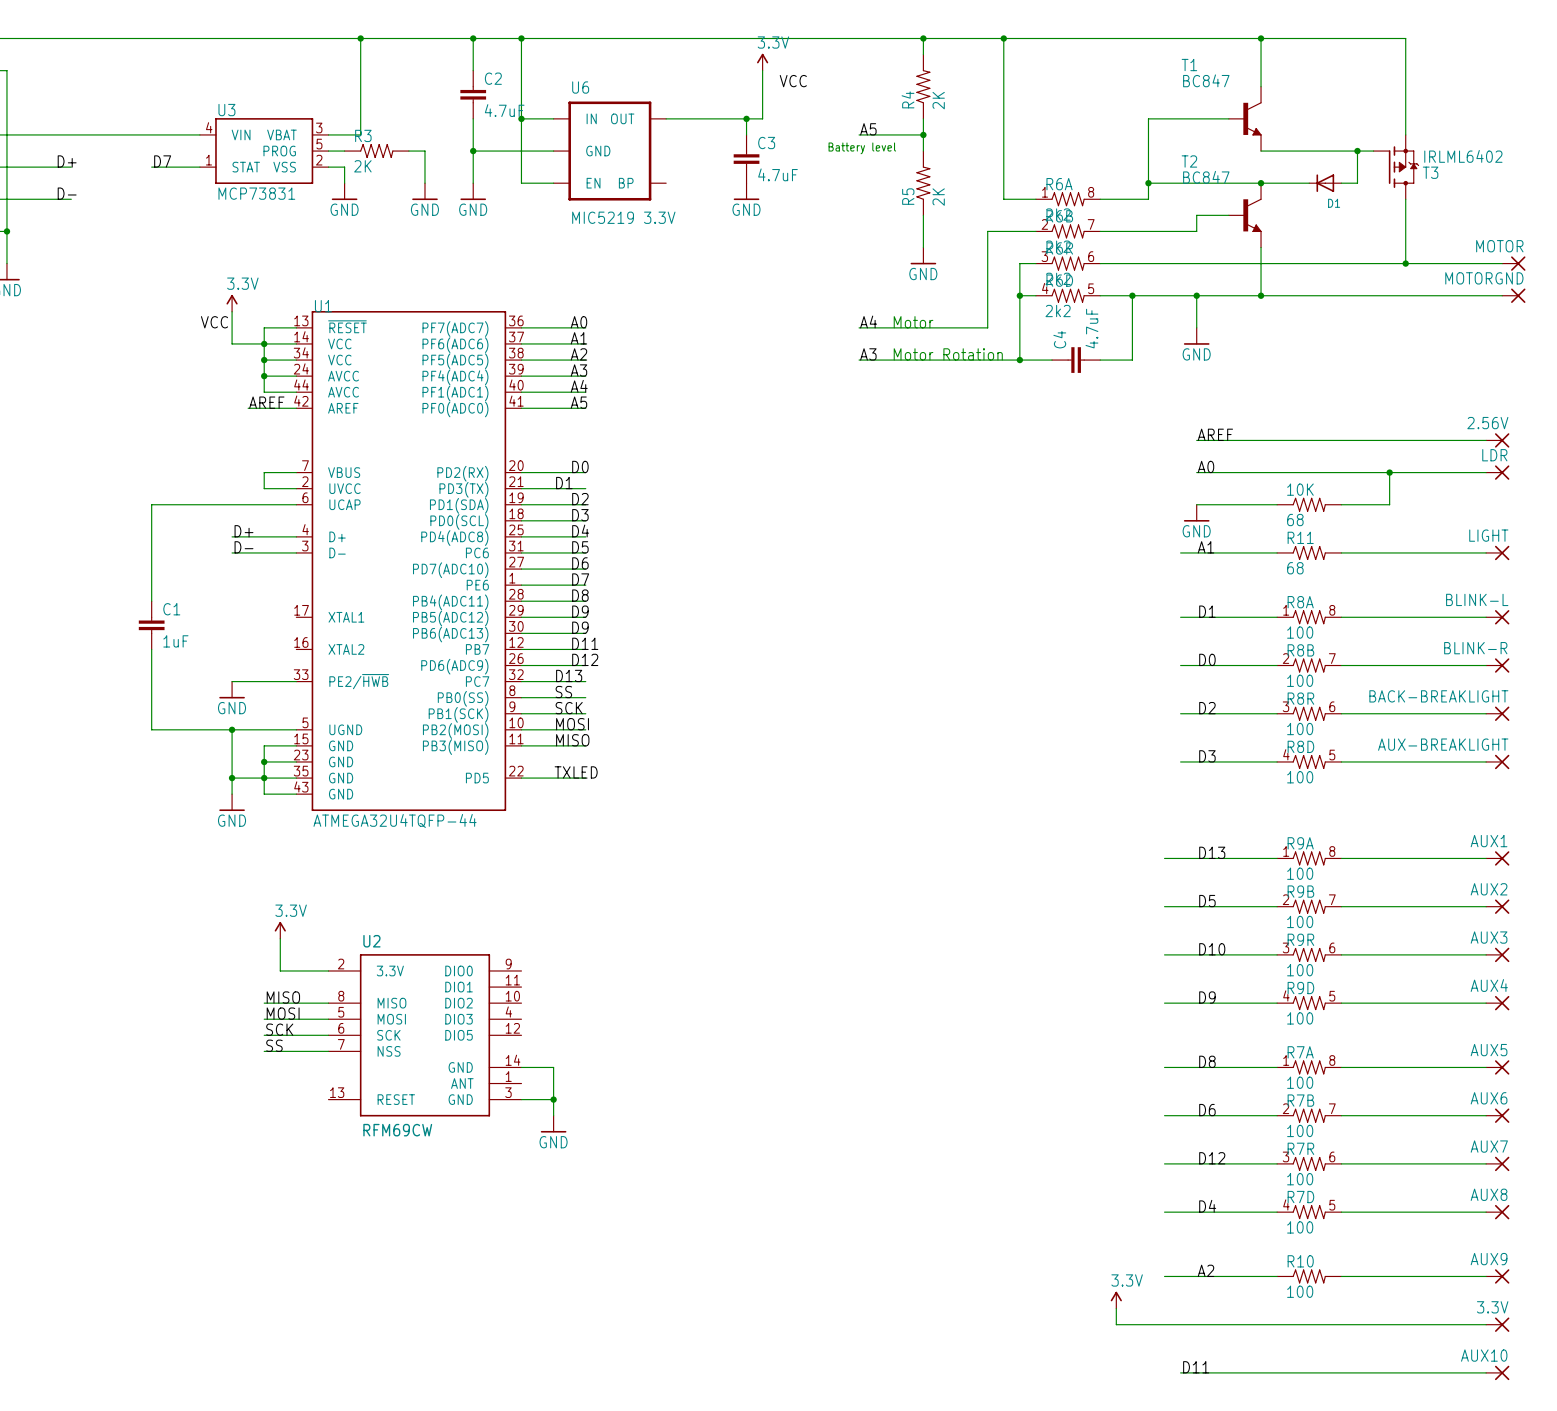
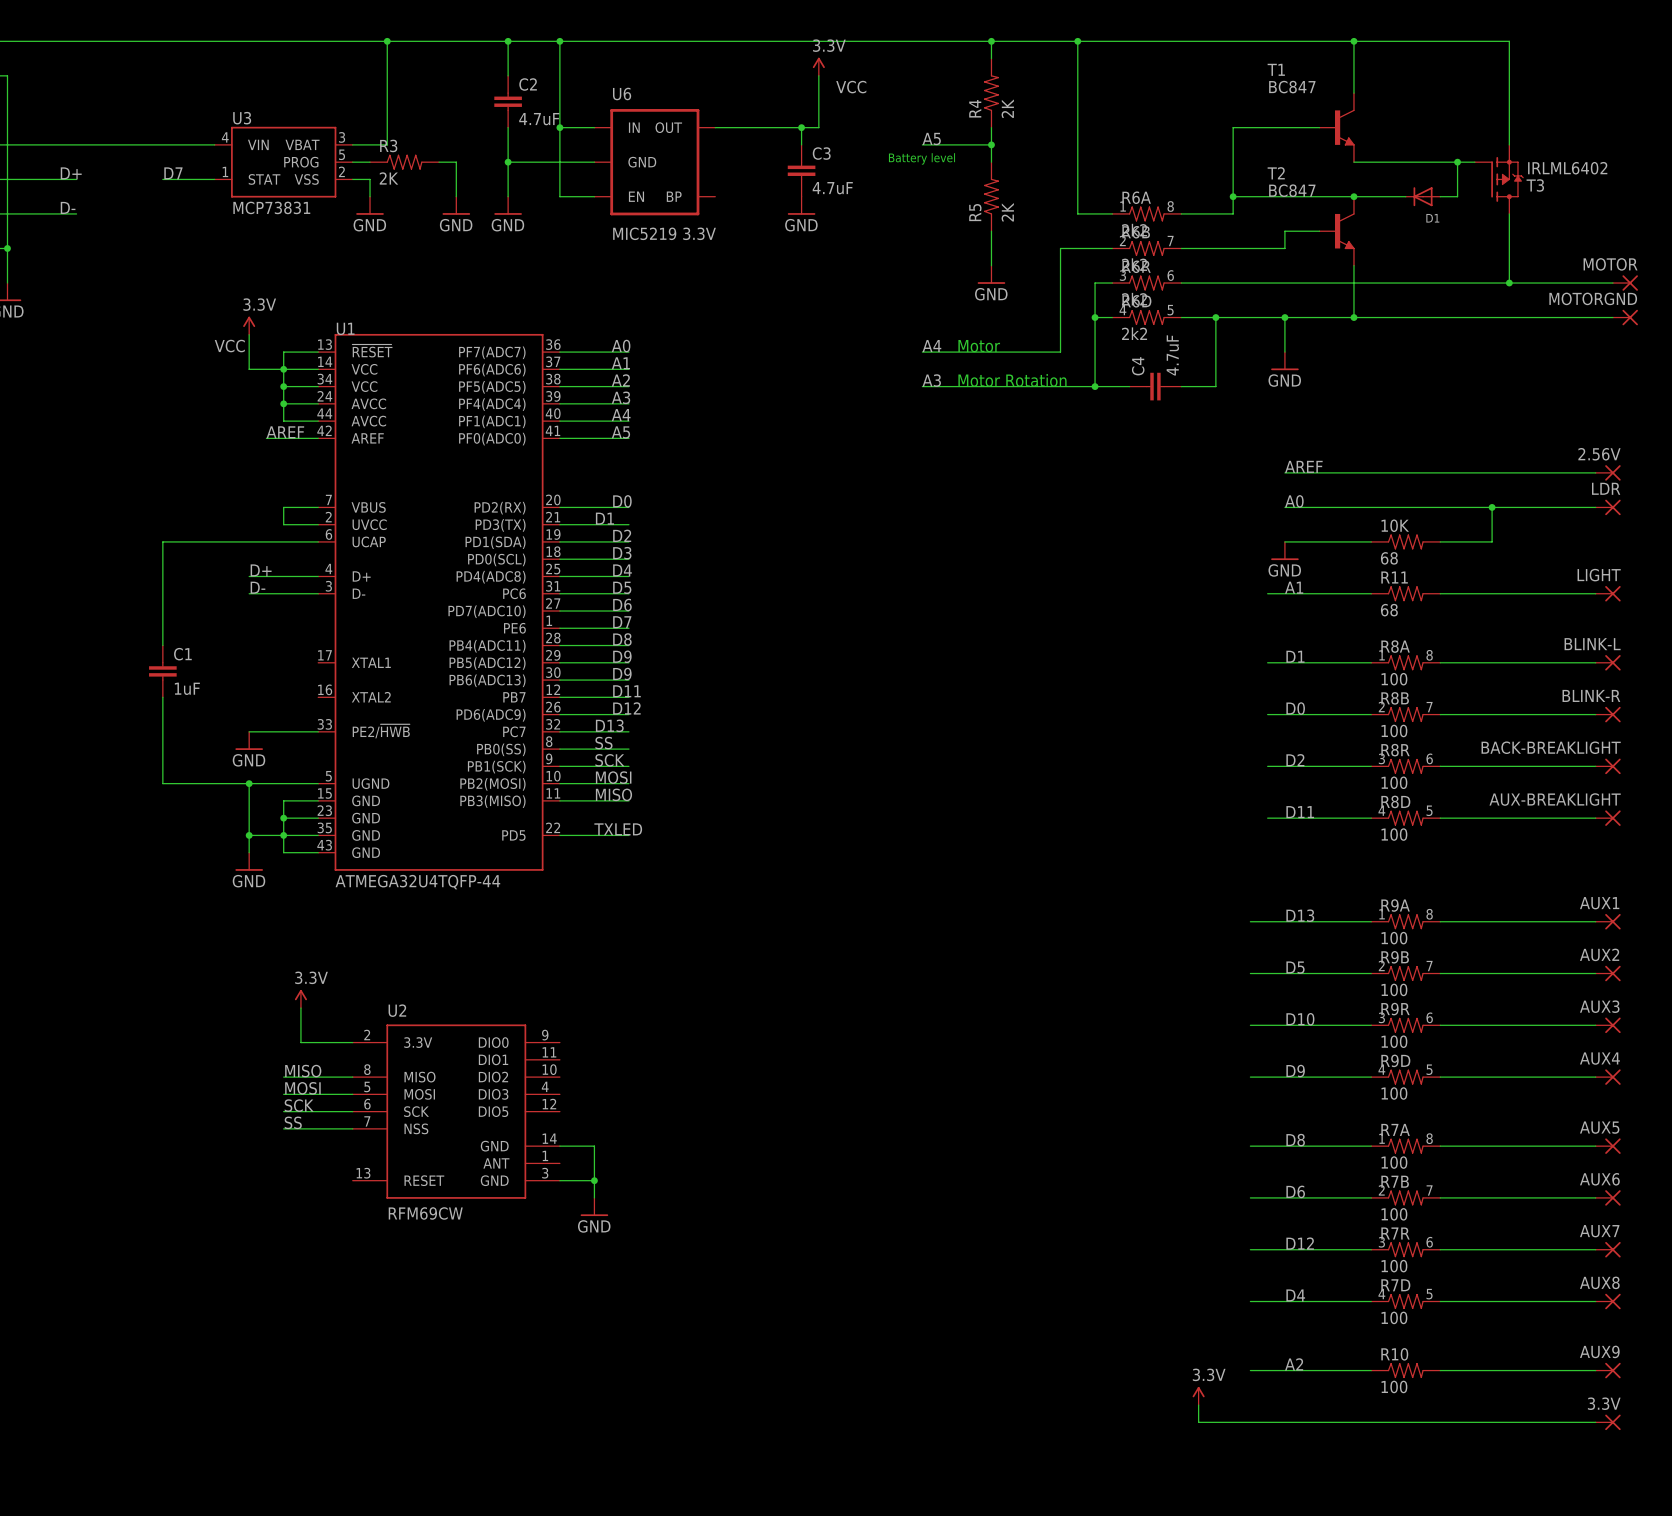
label: D3 (1207, 756) -> D11 (1300, 812)
label: D11 (1196, 1367) -> none
wire: (1180, 1372) (1486, 1372) -> none
AUX10: (1497, 1372) -> none

